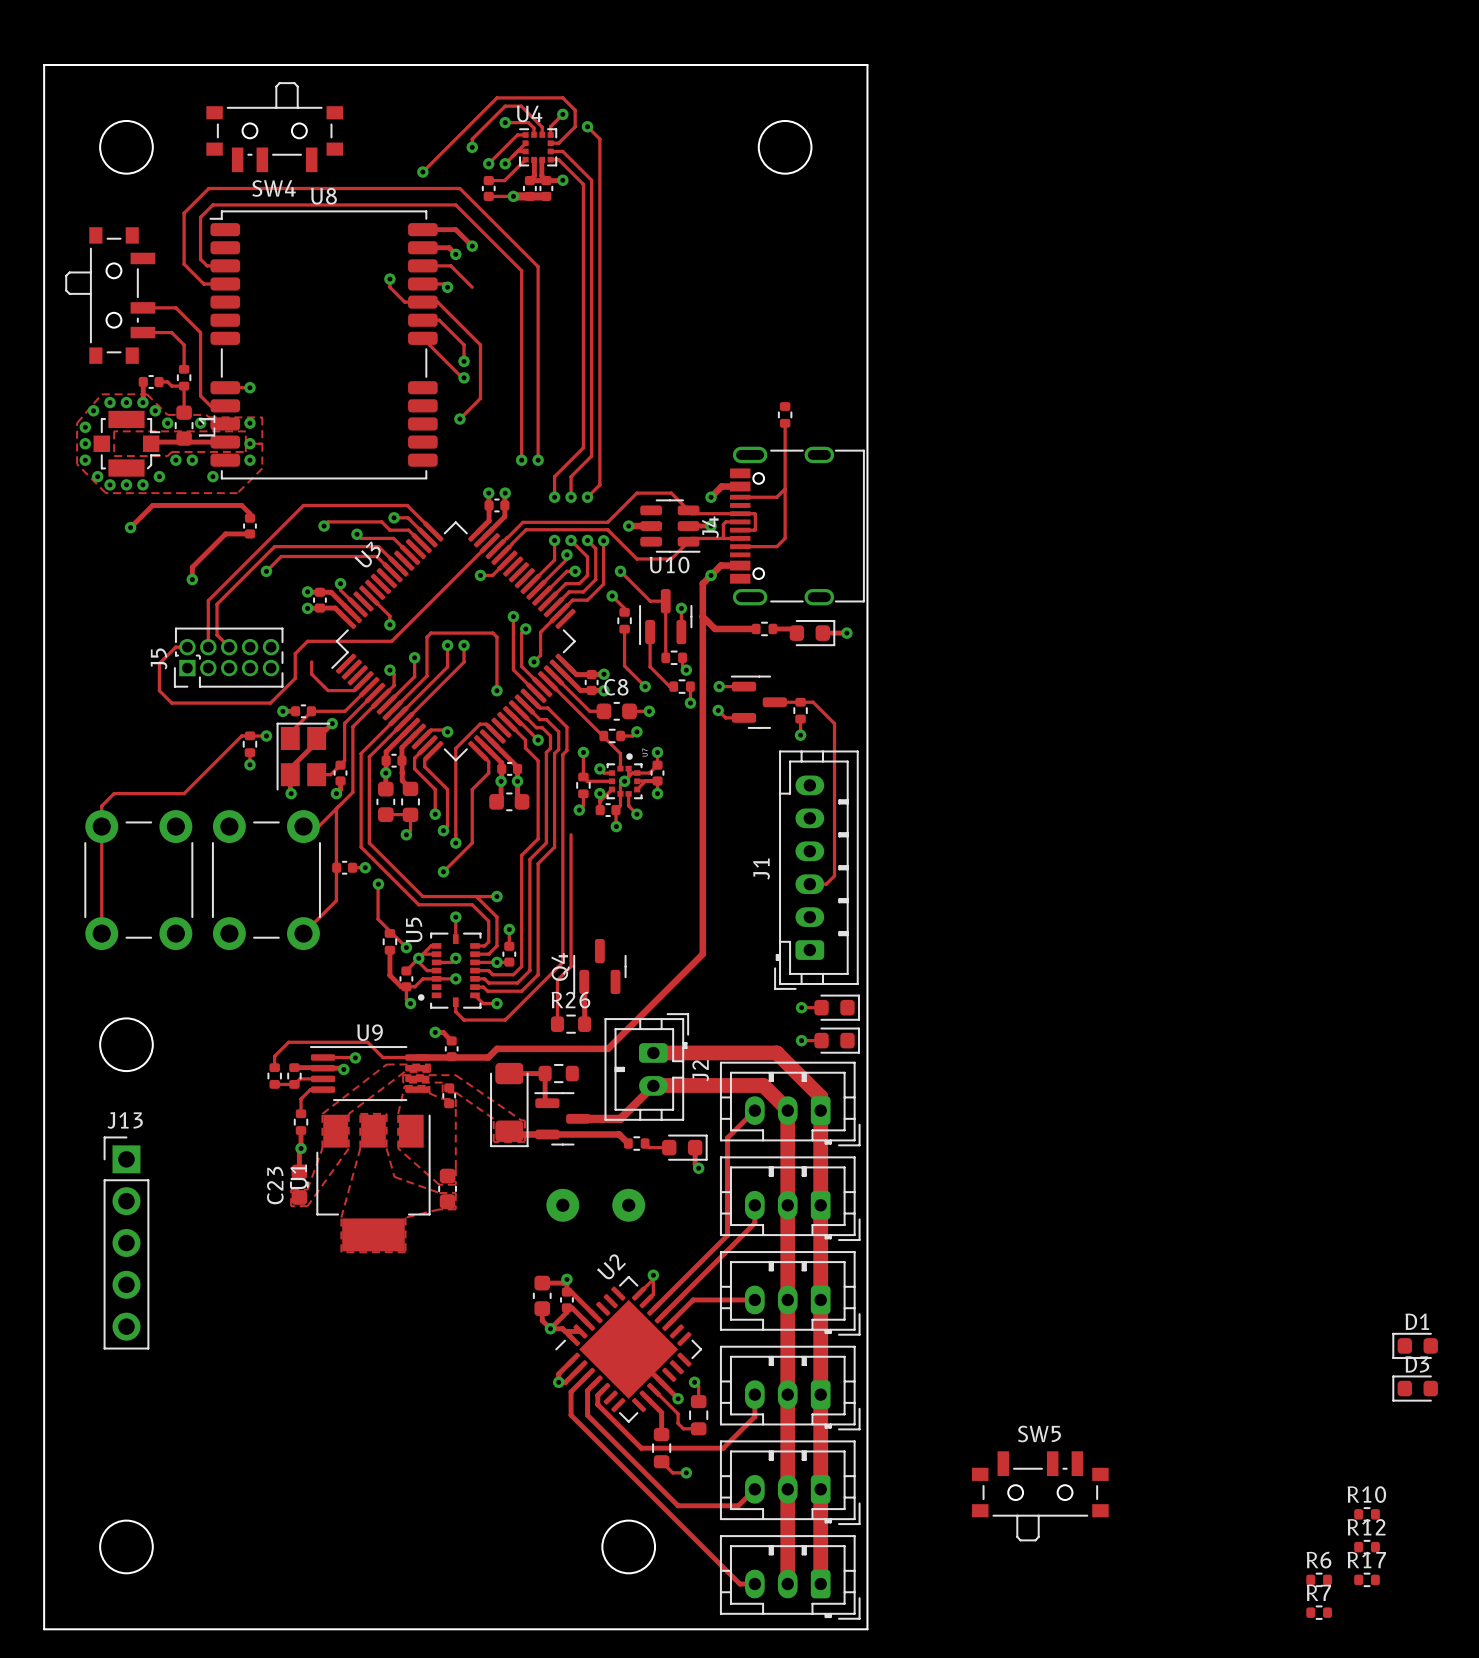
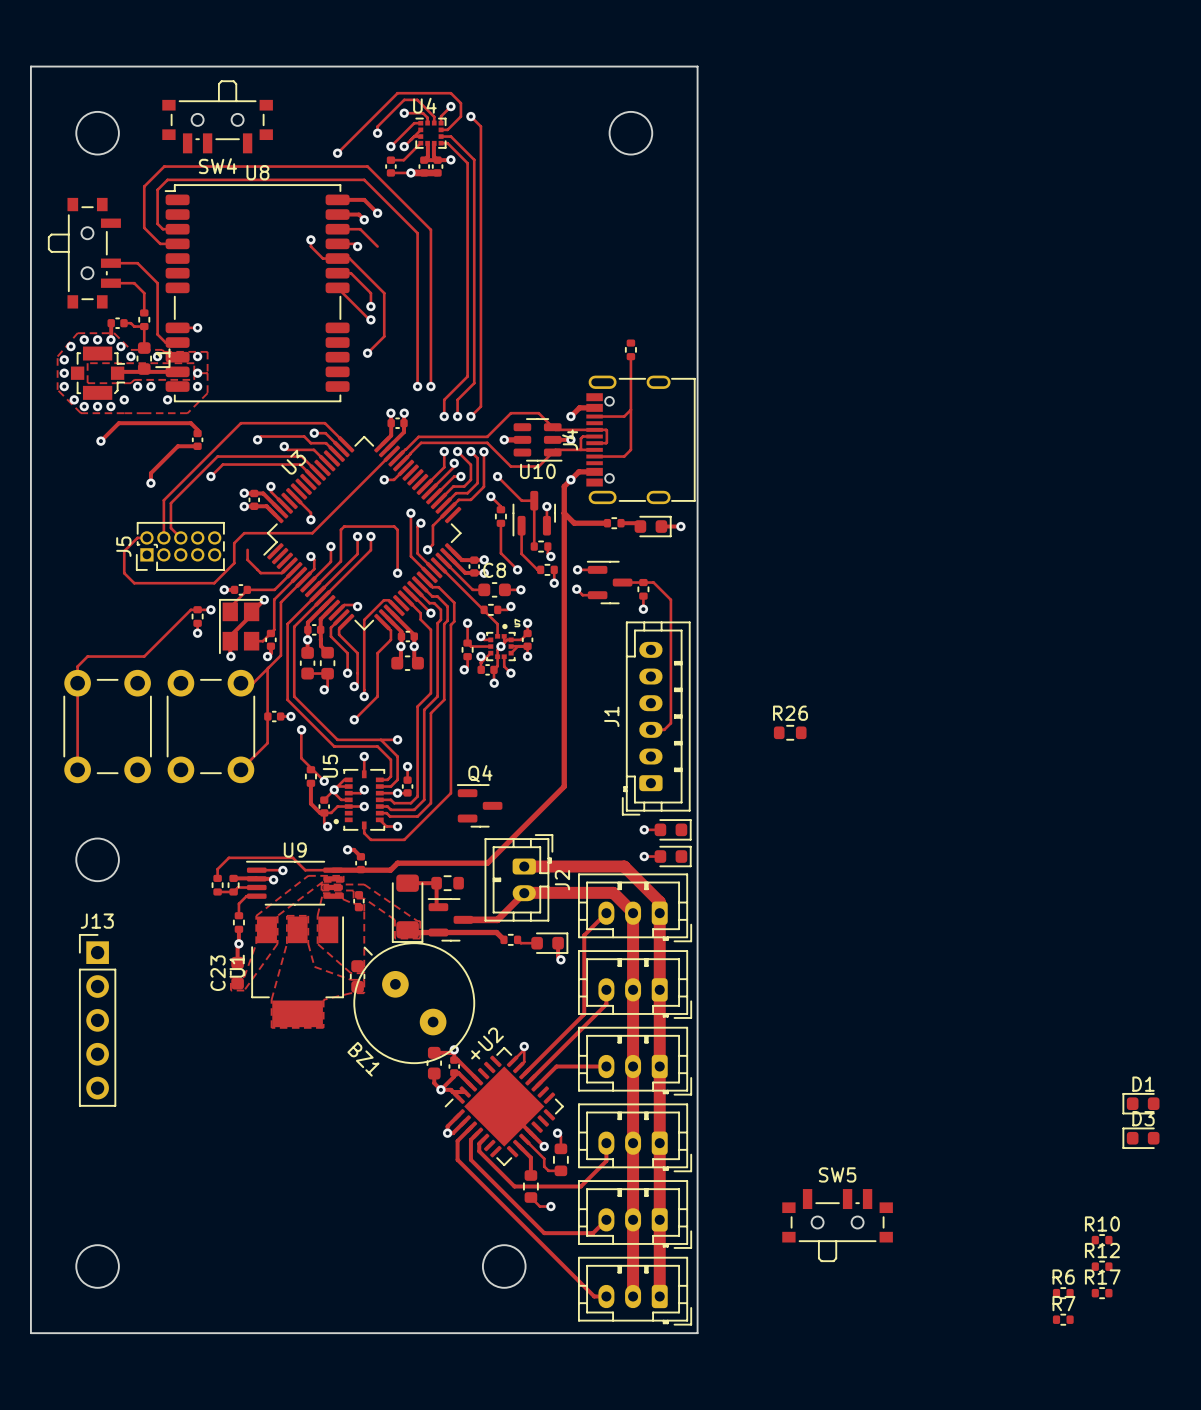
track: (571, 834) (571, 966) (557, 980) (557, 1024) -> none
Q4 rotation: 0° (599, 967) -> 90° clockwise (479, 805)
track: (584, 981) (584, 1024) -> none
R26 position: (571, 1024) -> (790, 732)
BZ1 side: bottom (595, 1205) -> top (414, 1003)

